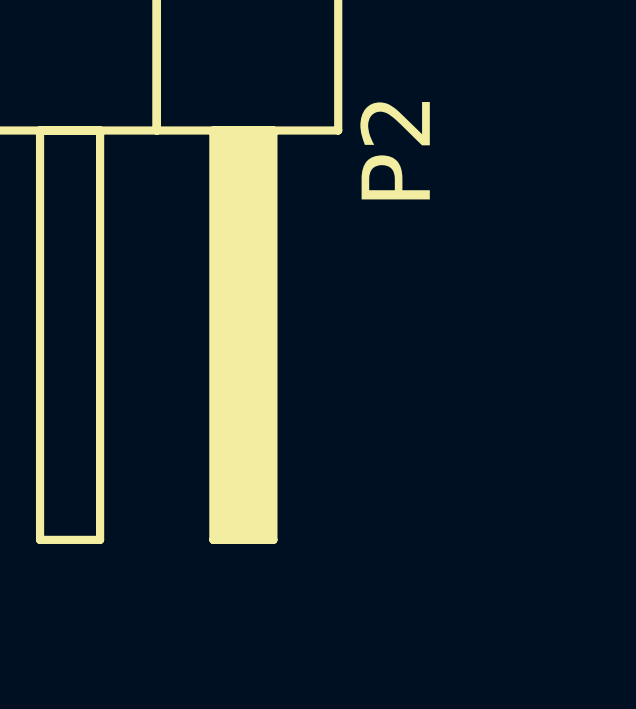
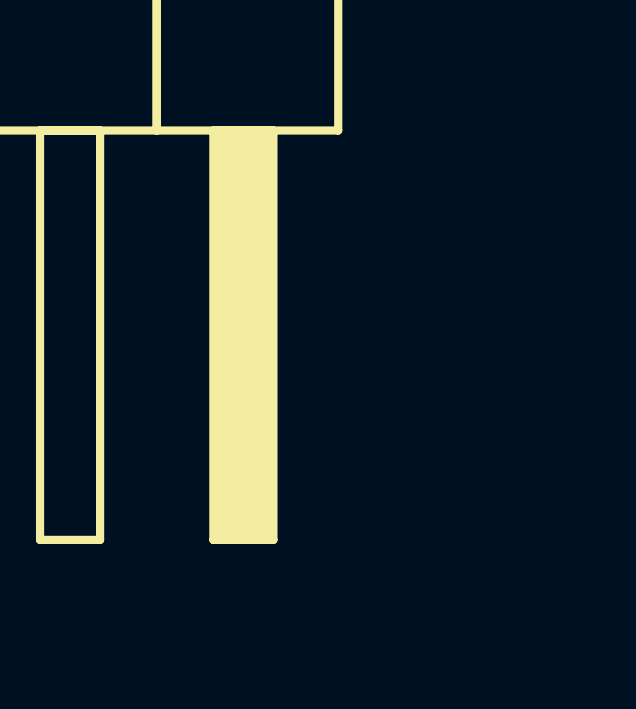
P2 name: P2 (395, 150) -> none

